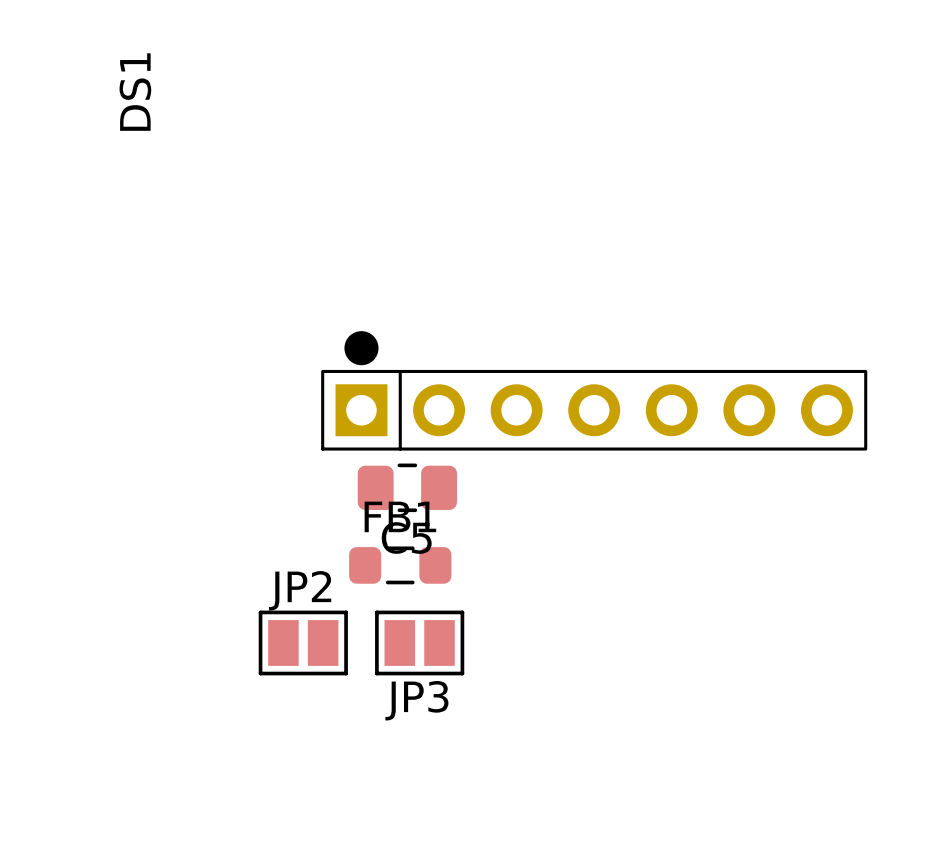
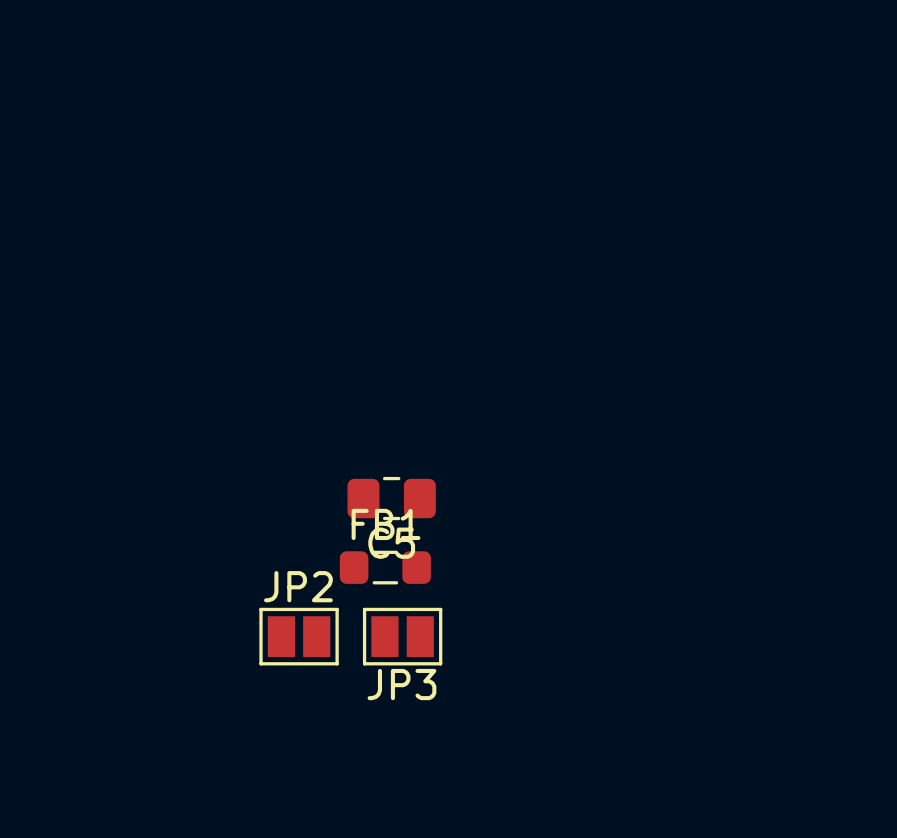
DS1: (594, 390) -> none

